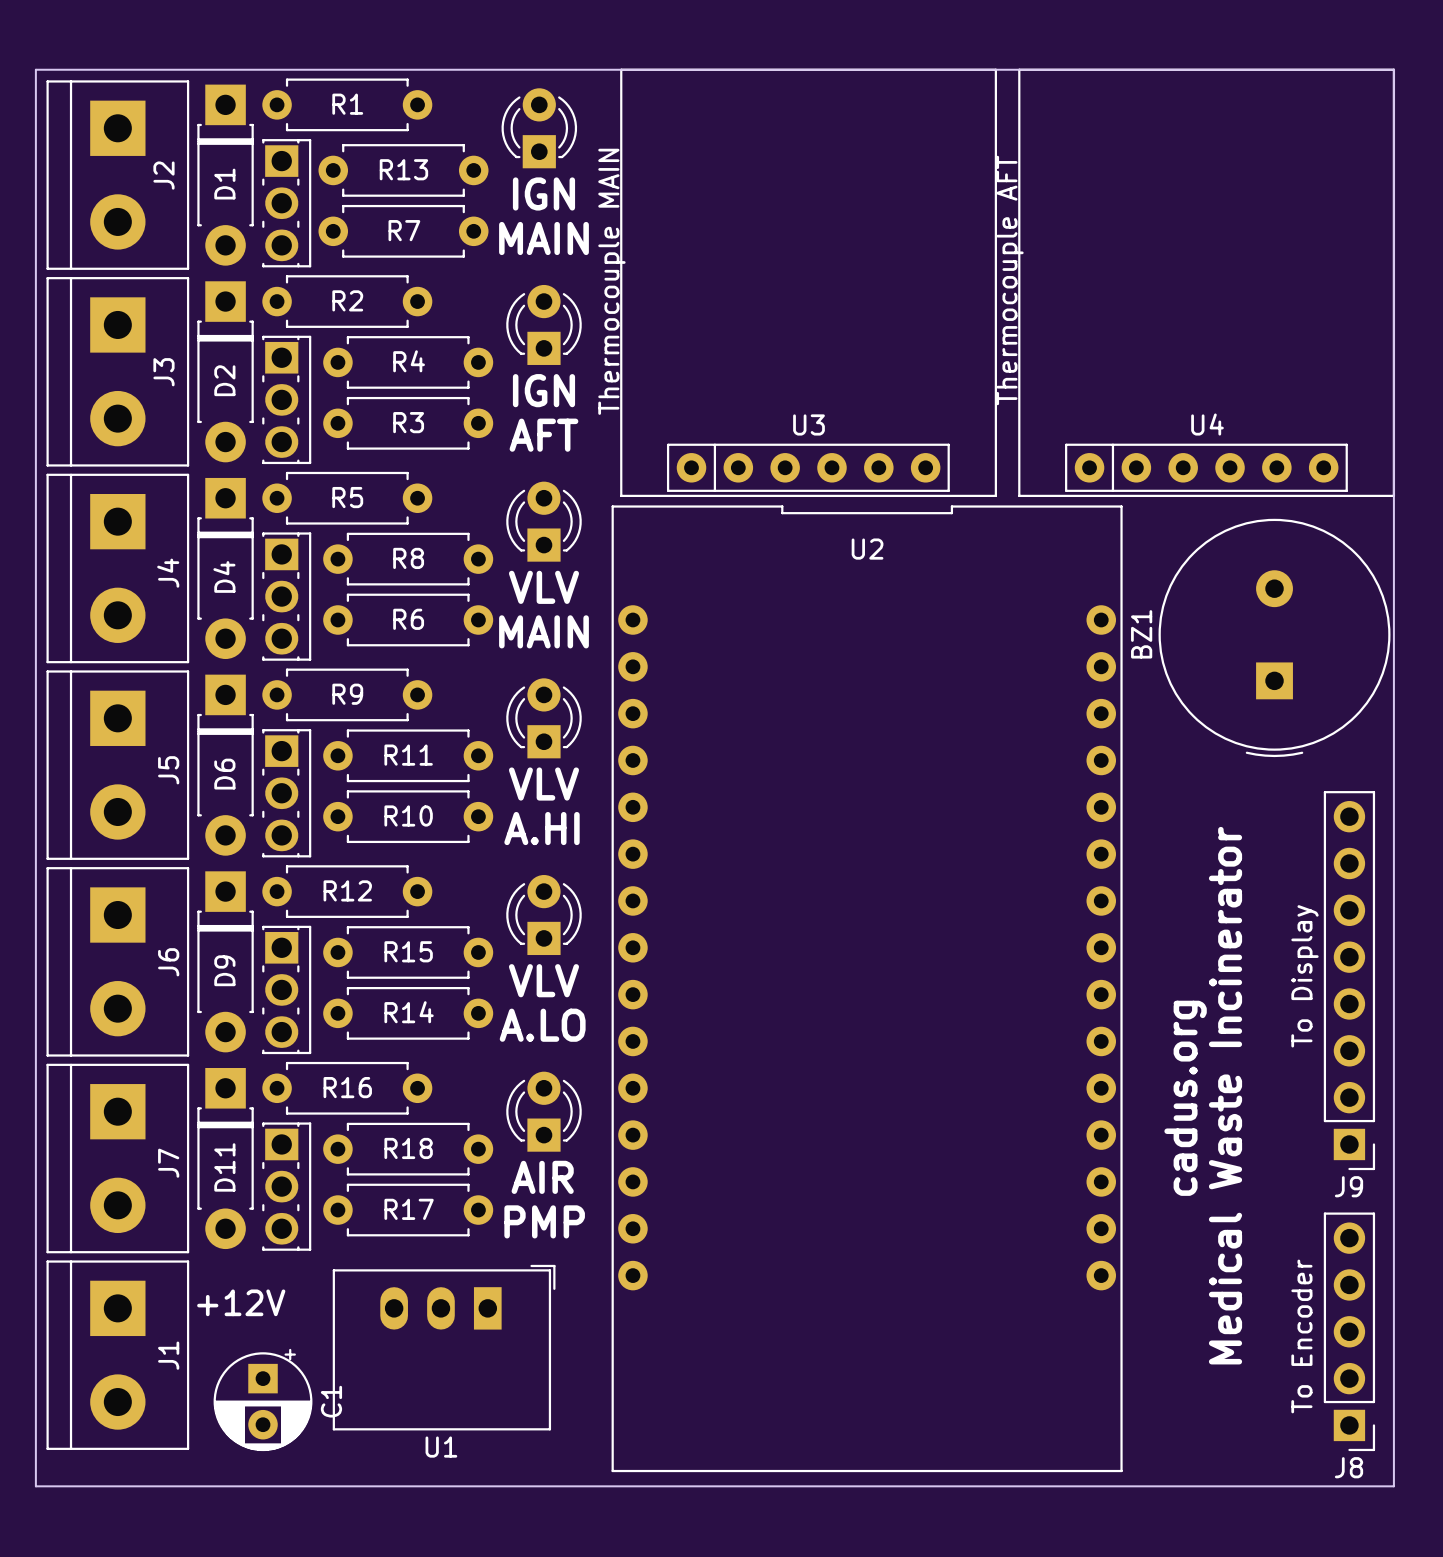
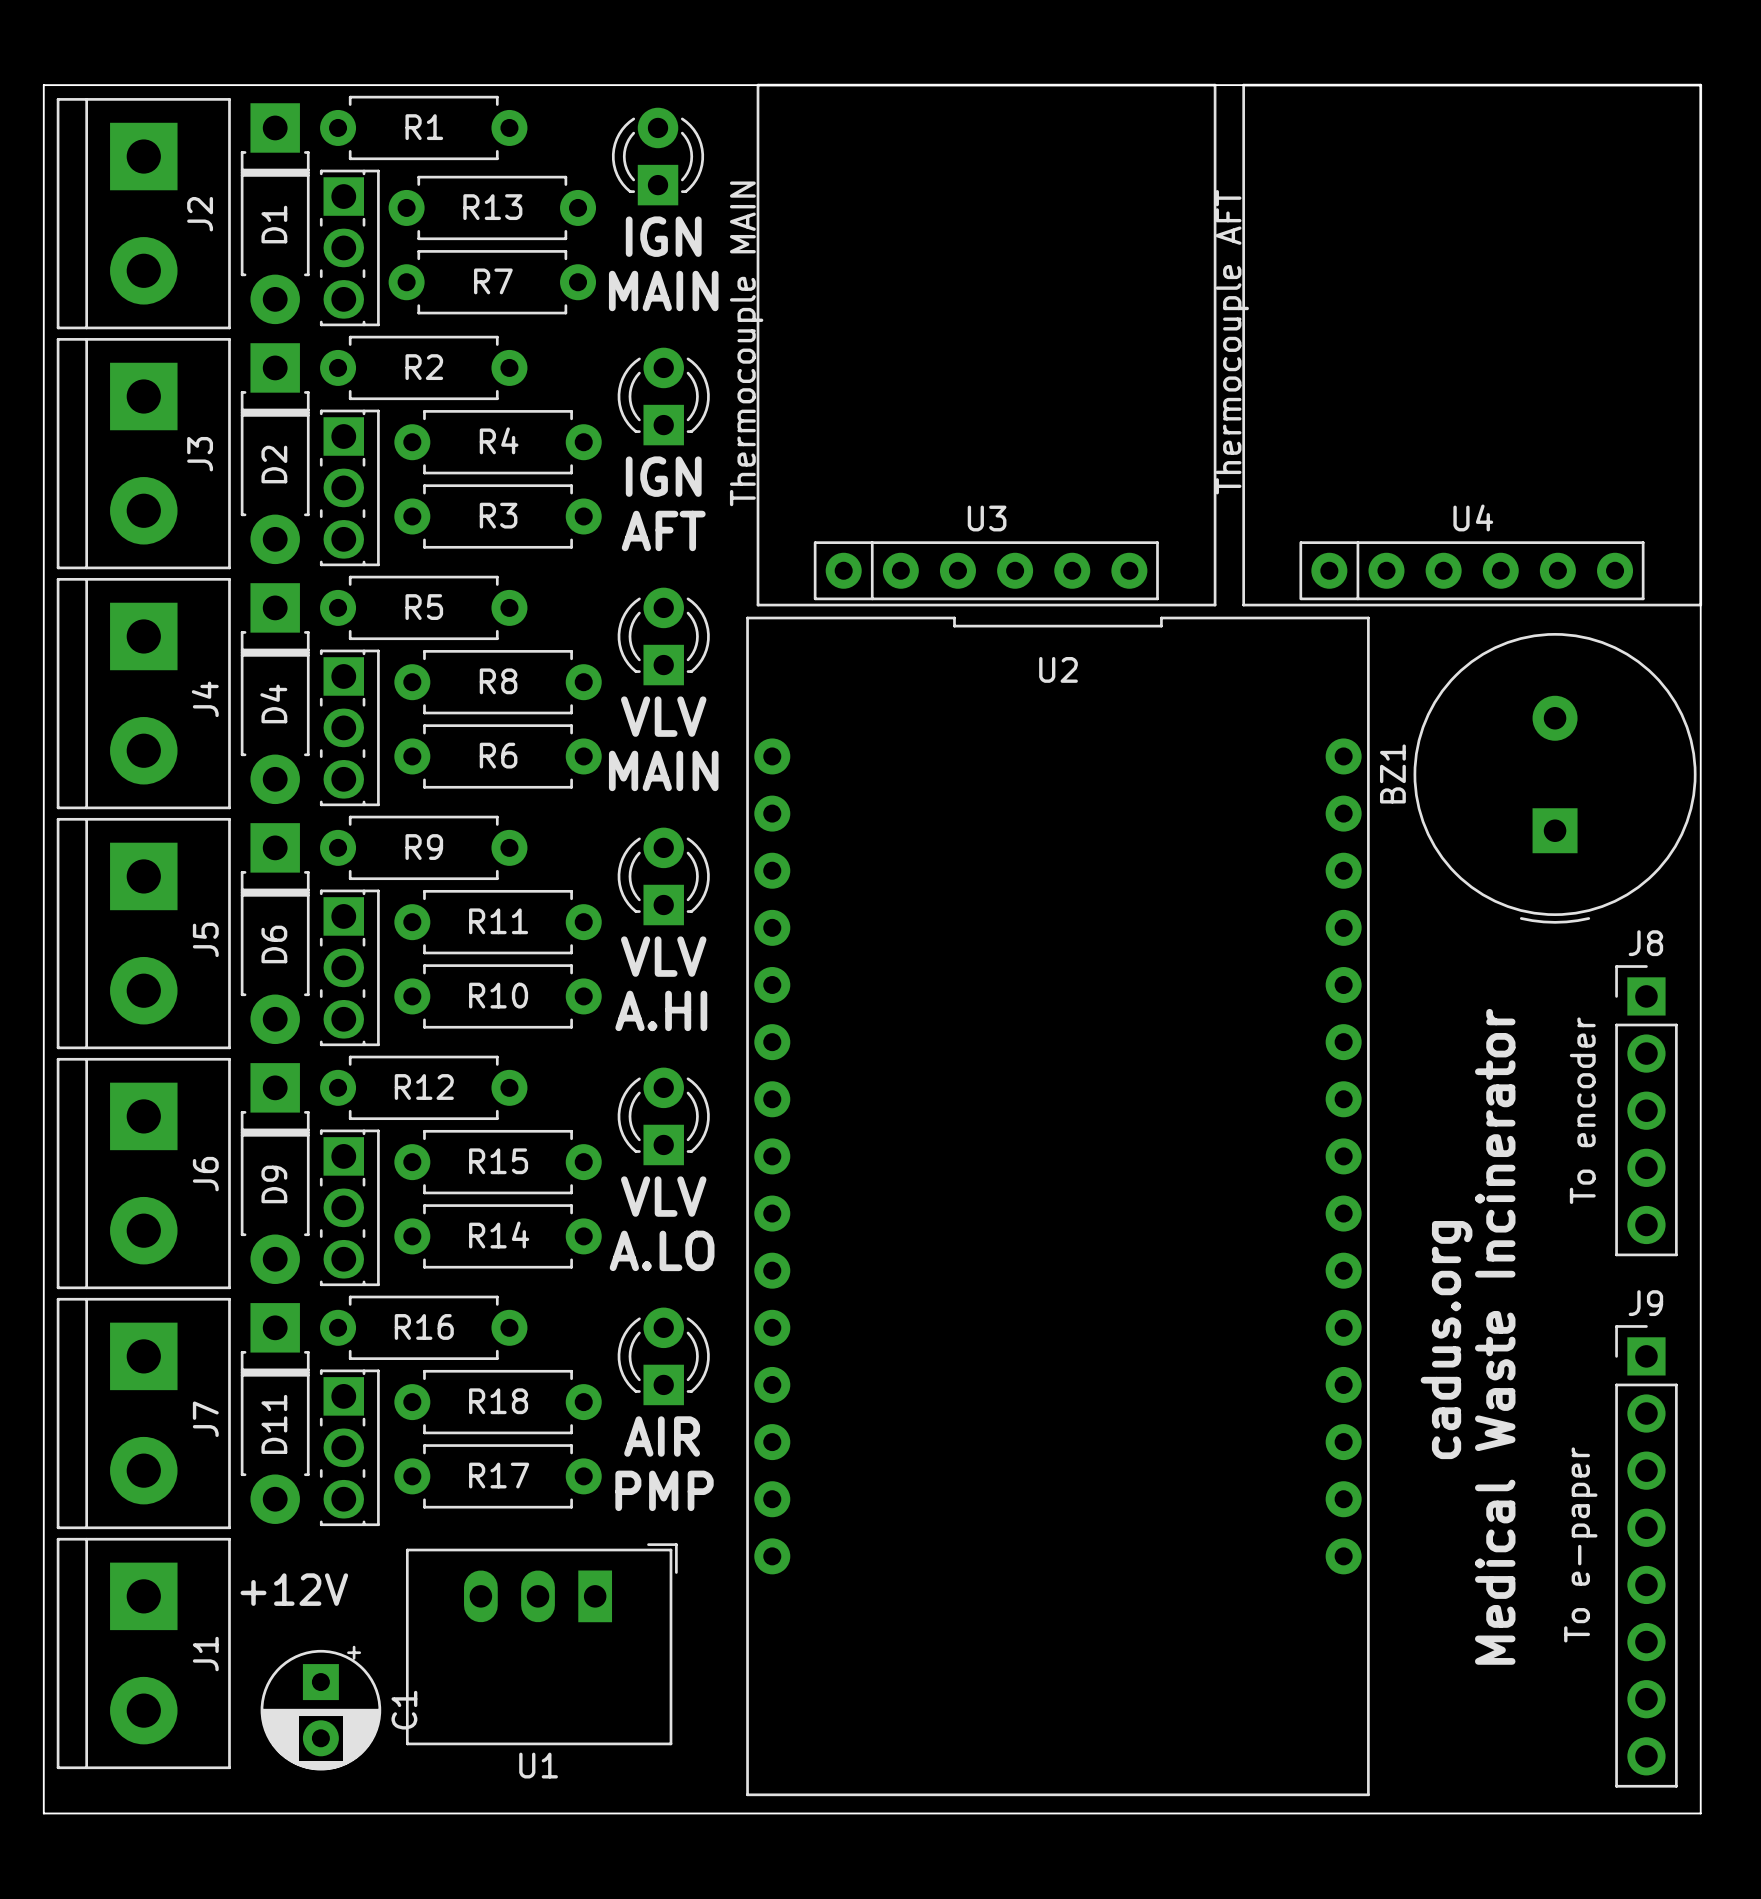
J9 value: To Display (1304, 976) -> To e-paper (1580, 1544)
J9 rotation: 0° (1349, 980) -> 180° (1646, 1556)
J9 position: (1349, 980) -> (1646, 1556)
J8 rotation: 0° (1349, 1331) -> 180° (1646, 1110)
J8 position: (1349, 1331) -> (1646, 1110)
J8 value: To Encoder (1301, 1336) -> To encoder (1582, 1110)

